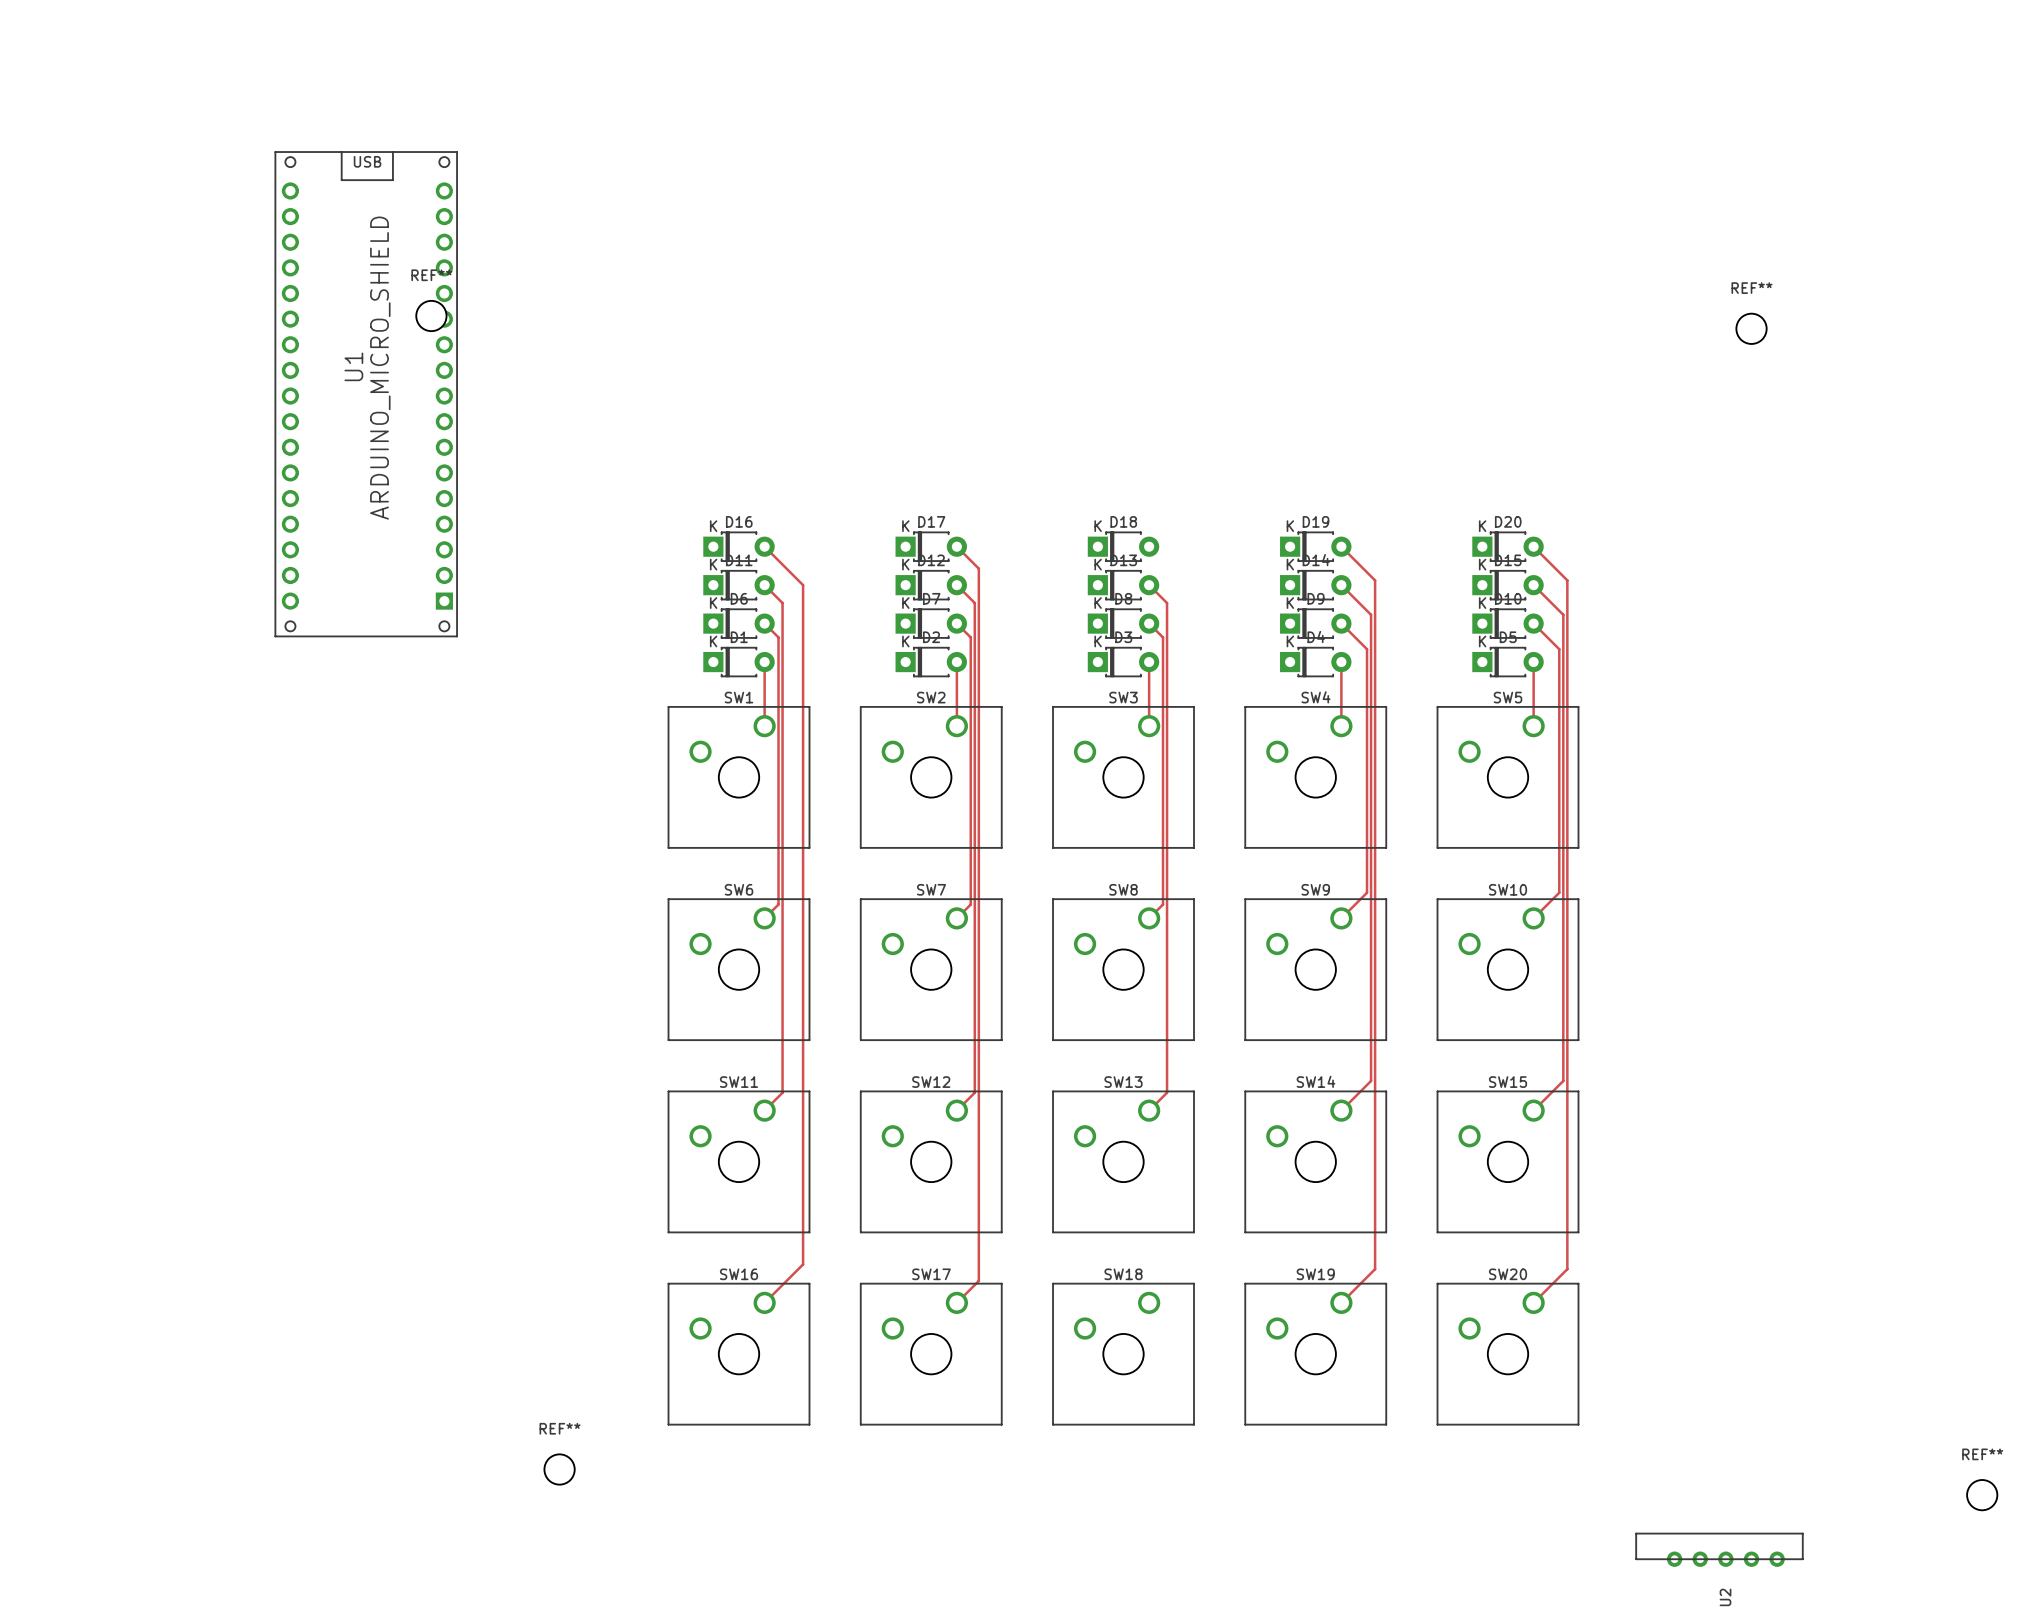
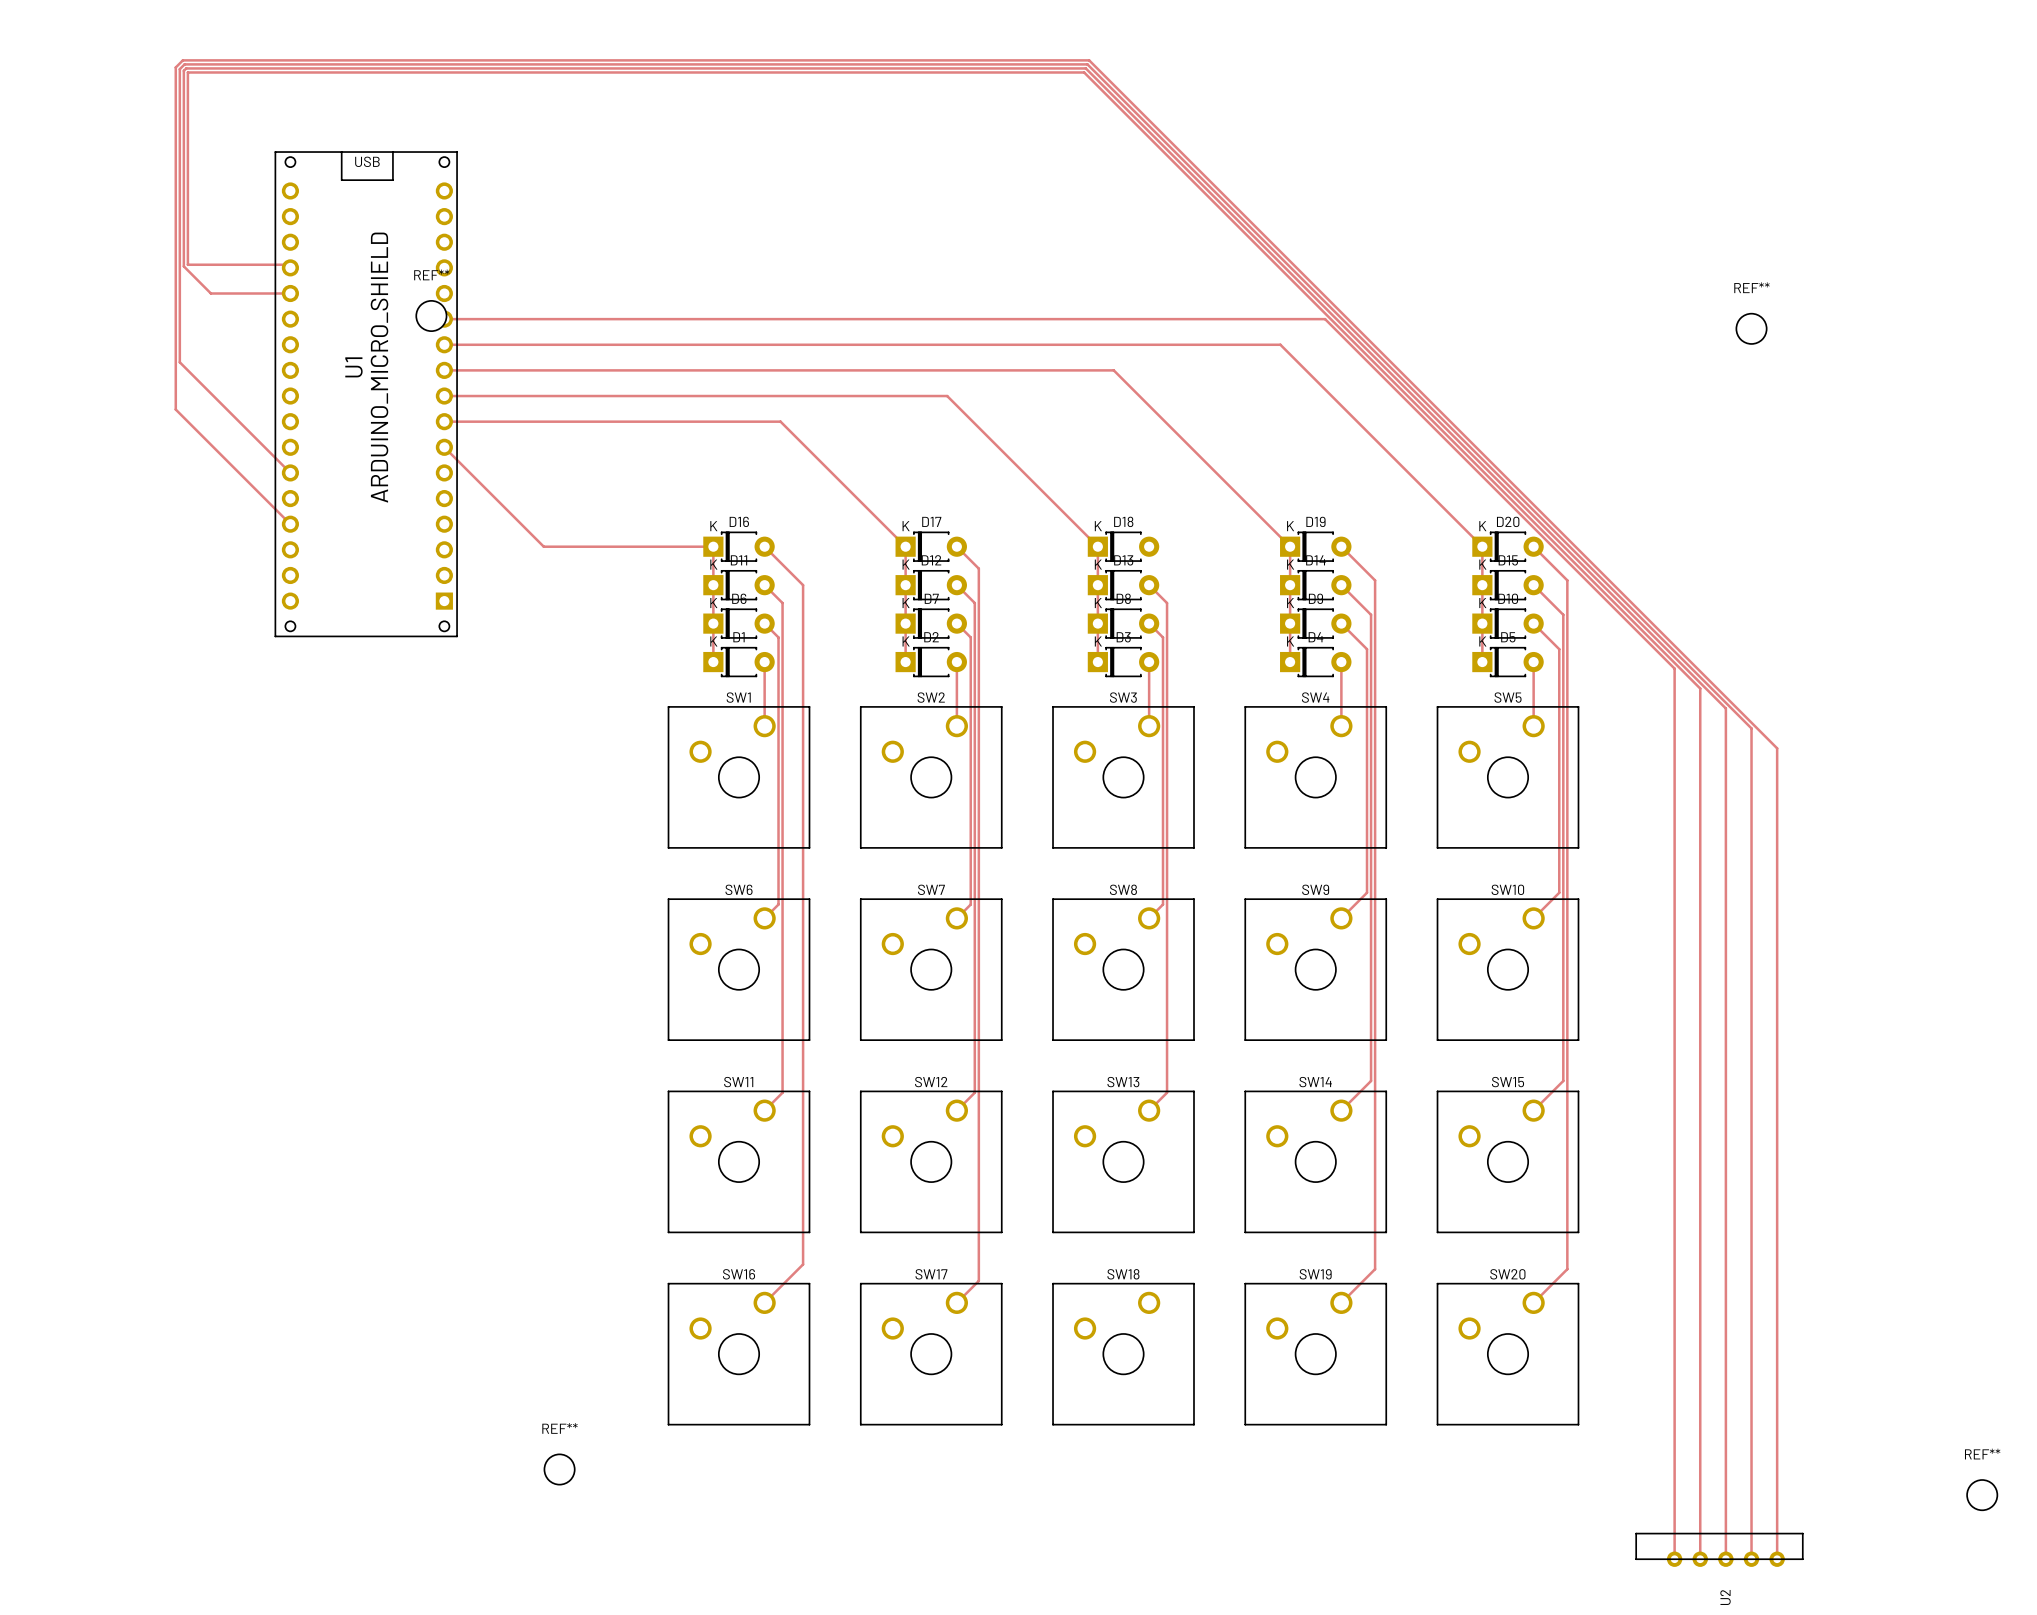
track: none -> (290, 267) (287, 264) (187, 264) (187, 72) (1084, 72) (1700, 688) (1700, 1559)
track: none -> (290, 293) (210, 293) (183, 266) (183, 70) (186, 68) (1085, 68) (1725, 708) (1725, 1559)
track: none -> (449, 319) (1325, 319) (1674, 668) (1674, 1559)
track: none -> (444, 344) (1280, 344) (1482, 546) (1482, 662)
track: none -> (444, 370) (1113, 370) (1290, 546) (1290, 662)
track: none -> (444, 396) (947, 396) (1097, 546) (1097, 662)
track: none -> (444, 421) (780, 421) (905, 546) (905, 662)
track: none -> (444, 447) (543, 546) (713, 546) (713, 662)
track: none -> (290, 472) (179, 362) (179, 69) (184, 64) (1087, 64) (1751, 728) (1751, 1559)
track: none -> (290, 524) (175, 409) (175, 67) (182, 60) (1089, 60) (1777, 748) (1777, 1559)

